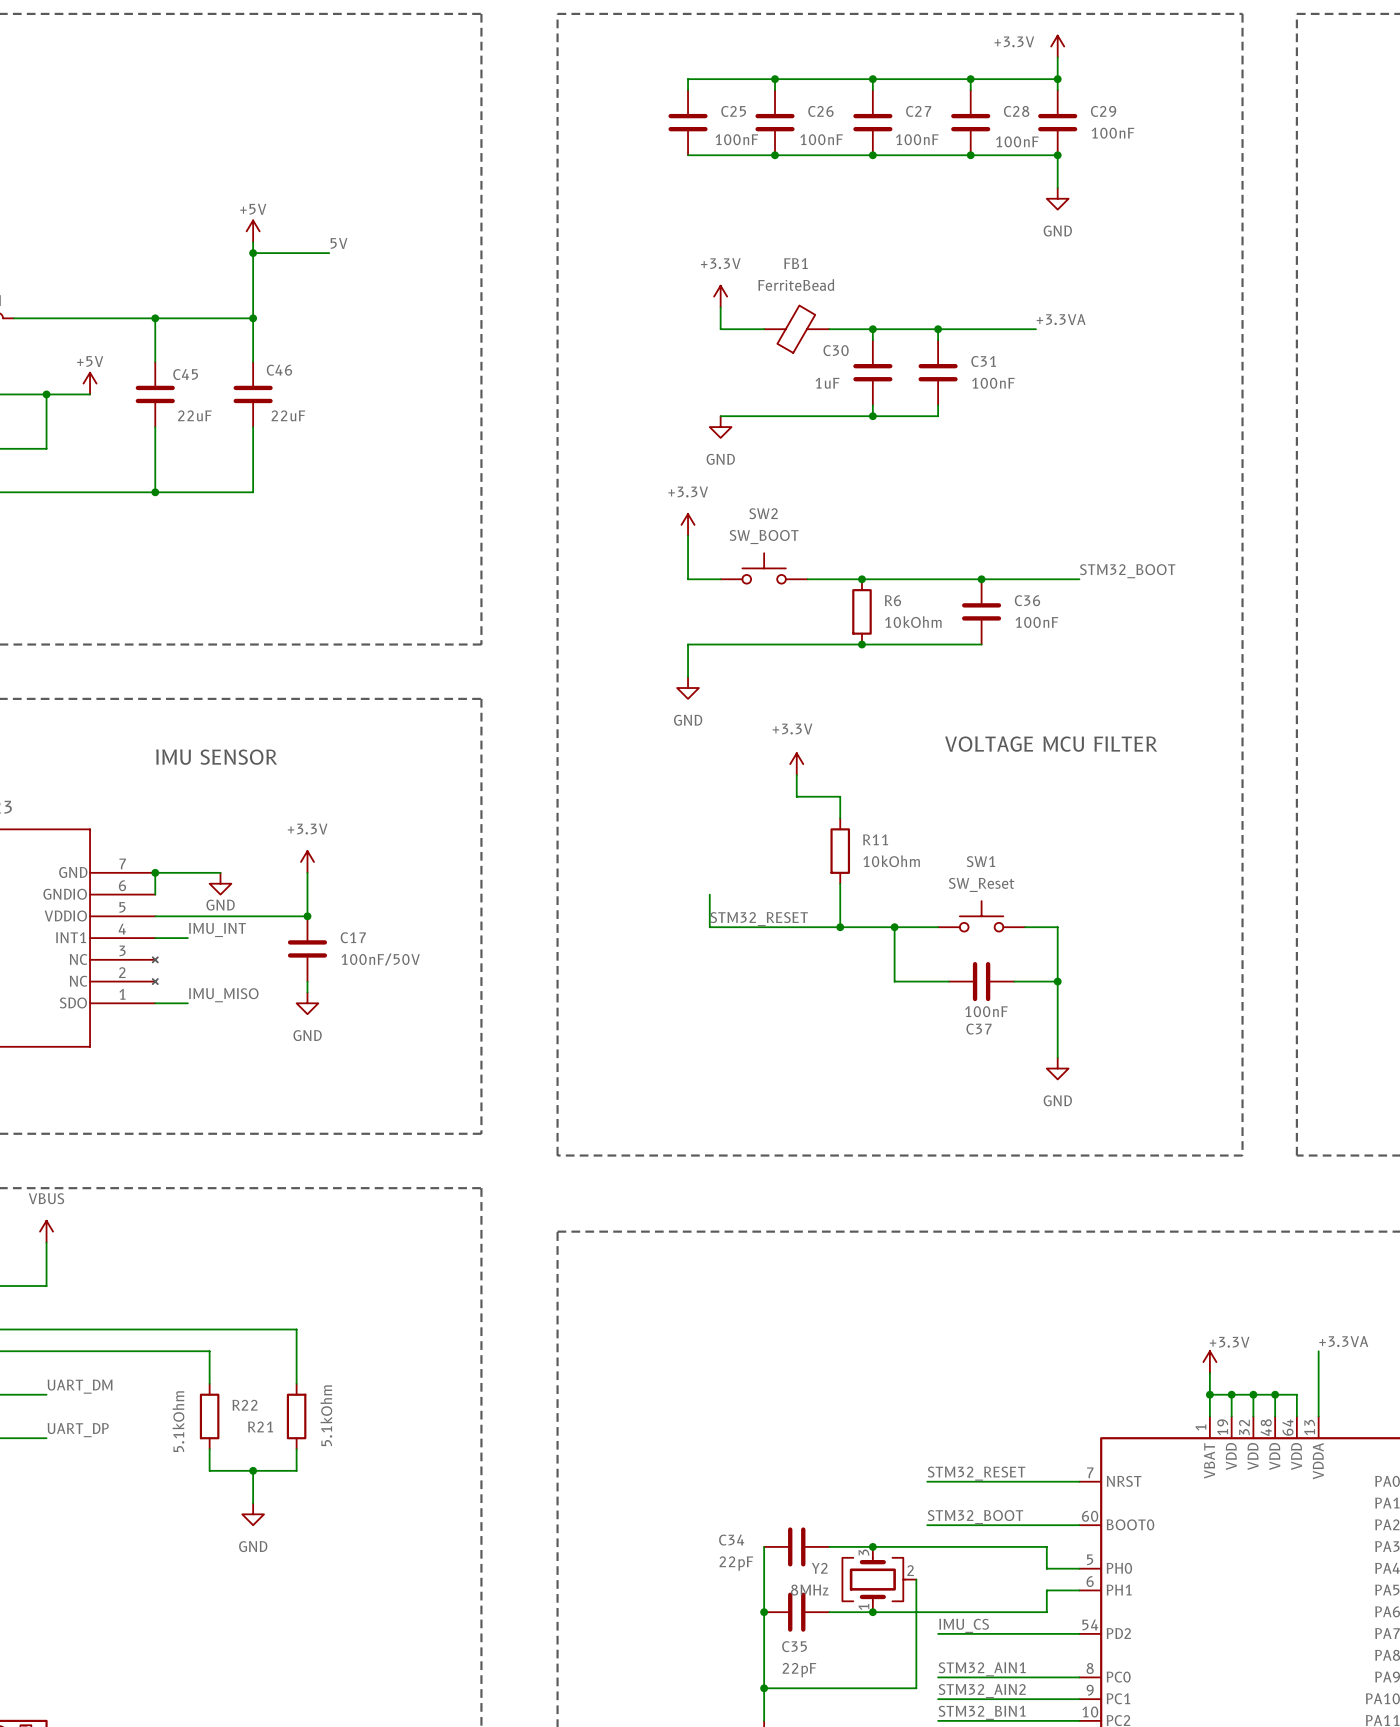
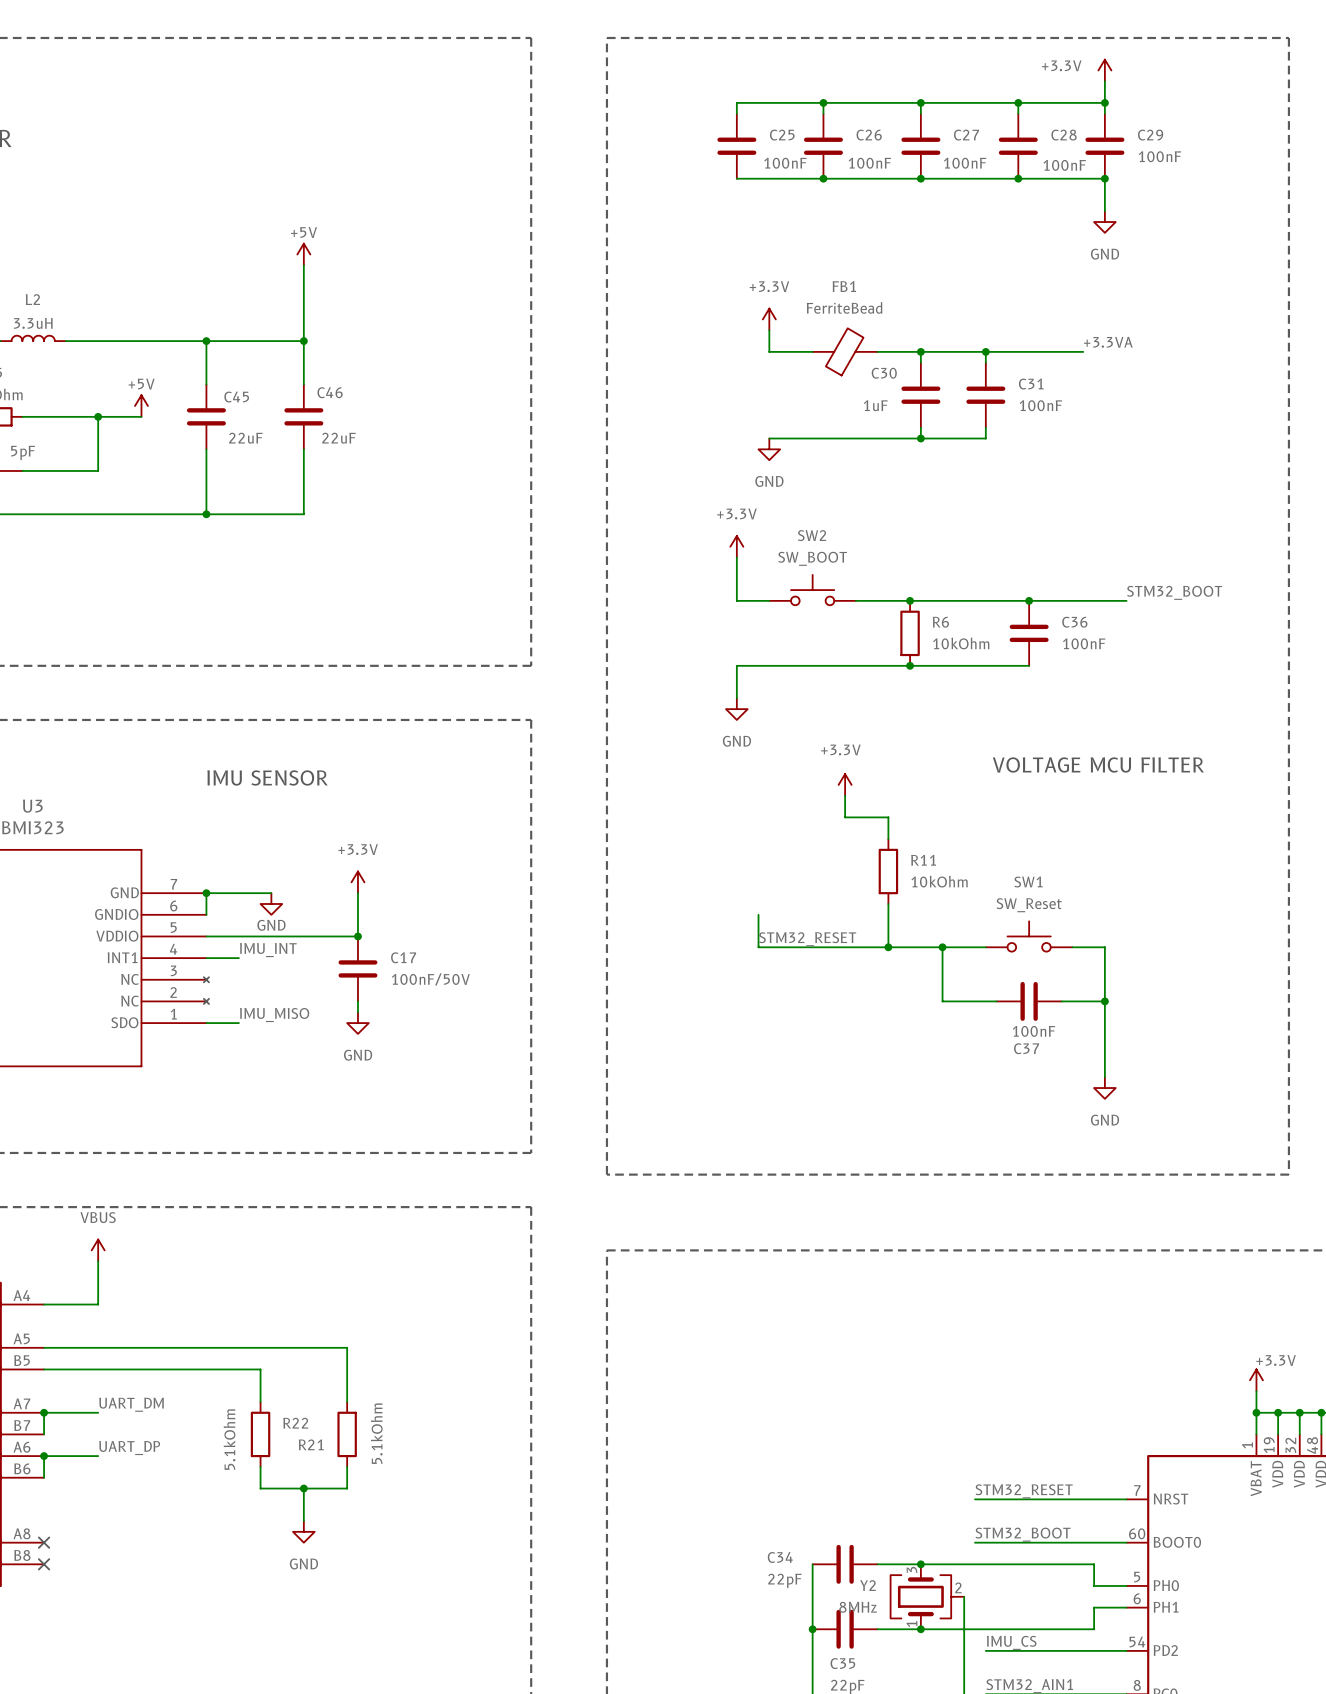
label: 5V (339, 243) -> none
wire: (253, 253) (329, 253) -> none
junction: (253, 253) -> none

